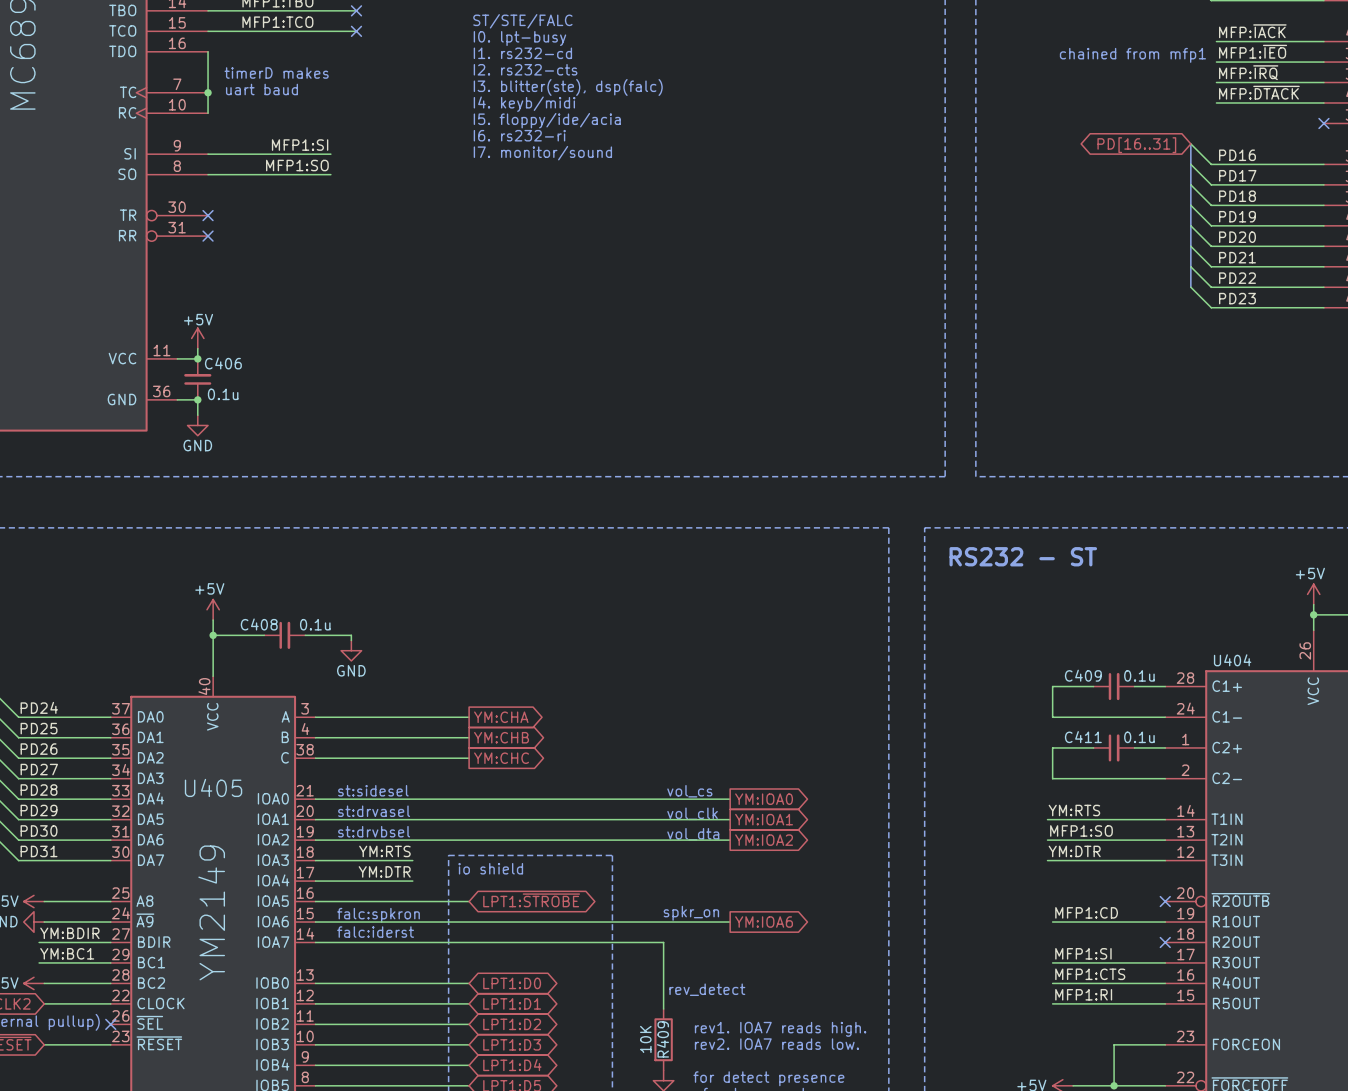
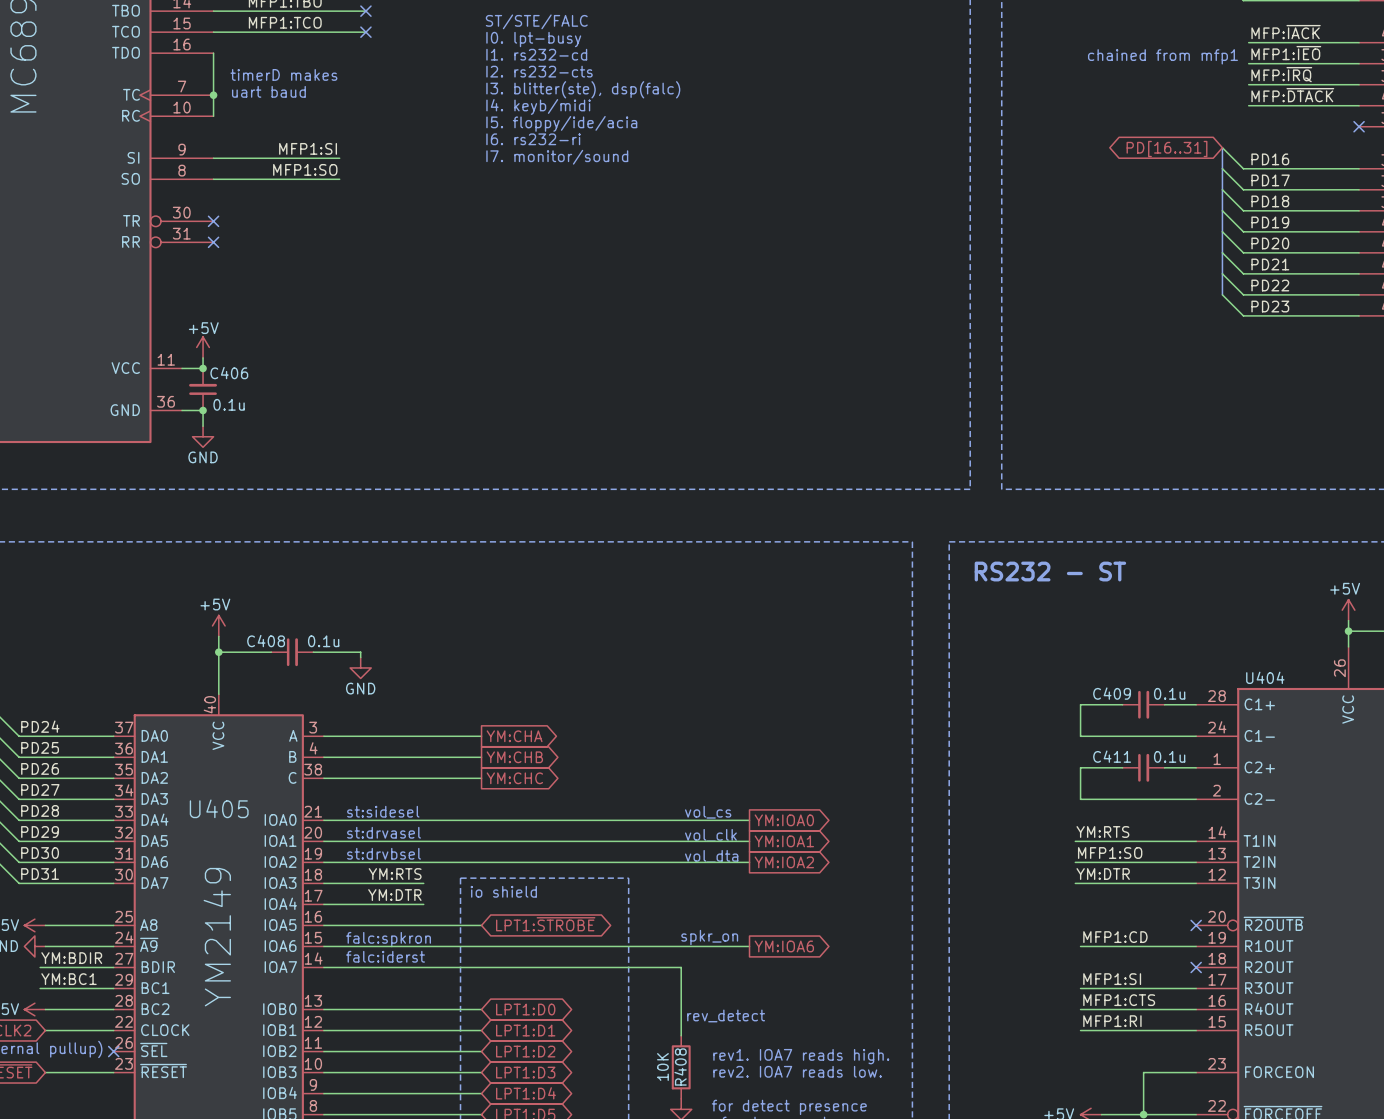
R409 name: R409 (662, 1039) -> R408 (680, 1066)

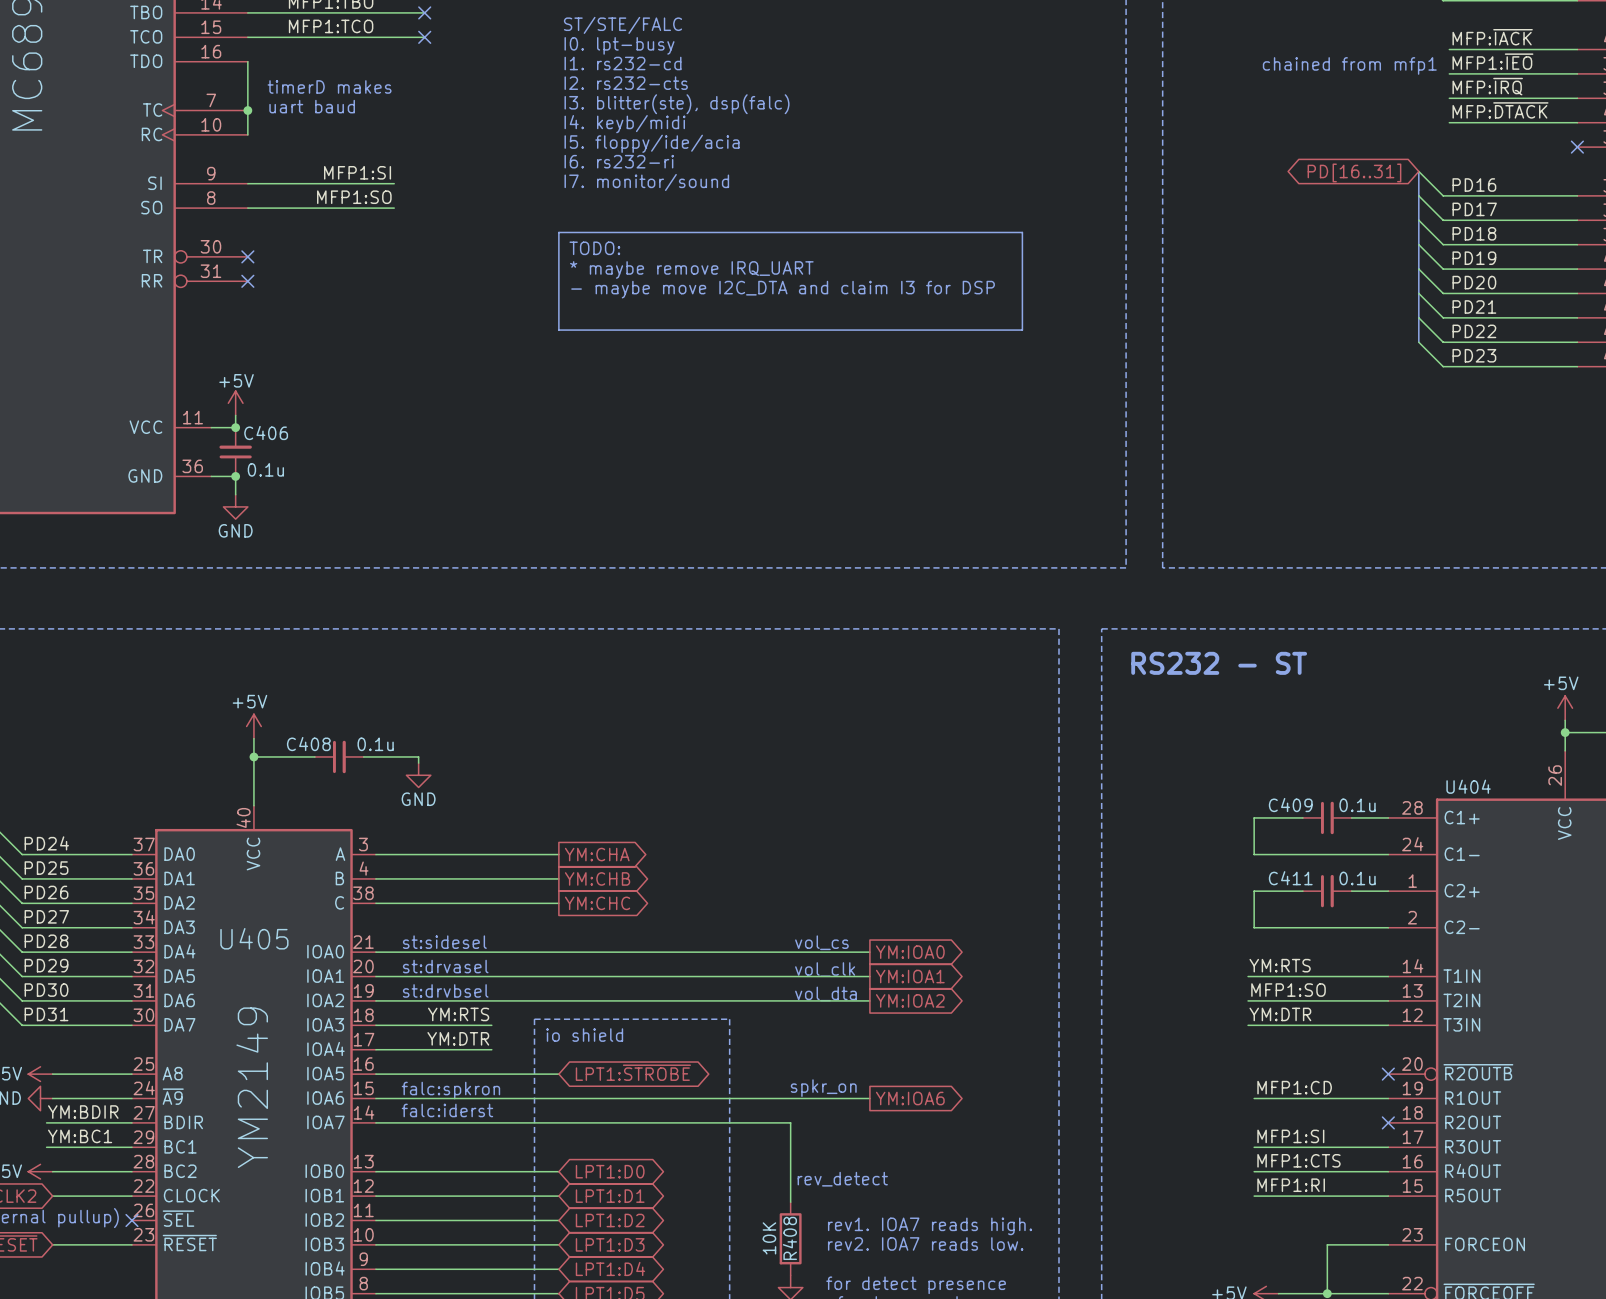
line: none -> (558, 232) (1022, 232) (1022, 330) (558, 330) (558, 232)
text: none -> TODO: (594, 248)
text: none -> * maybe remove IRQ_UART (691, 269)
text: none -> - maybe move I2C_DTA and claim I3 for DSP (783, 289)

